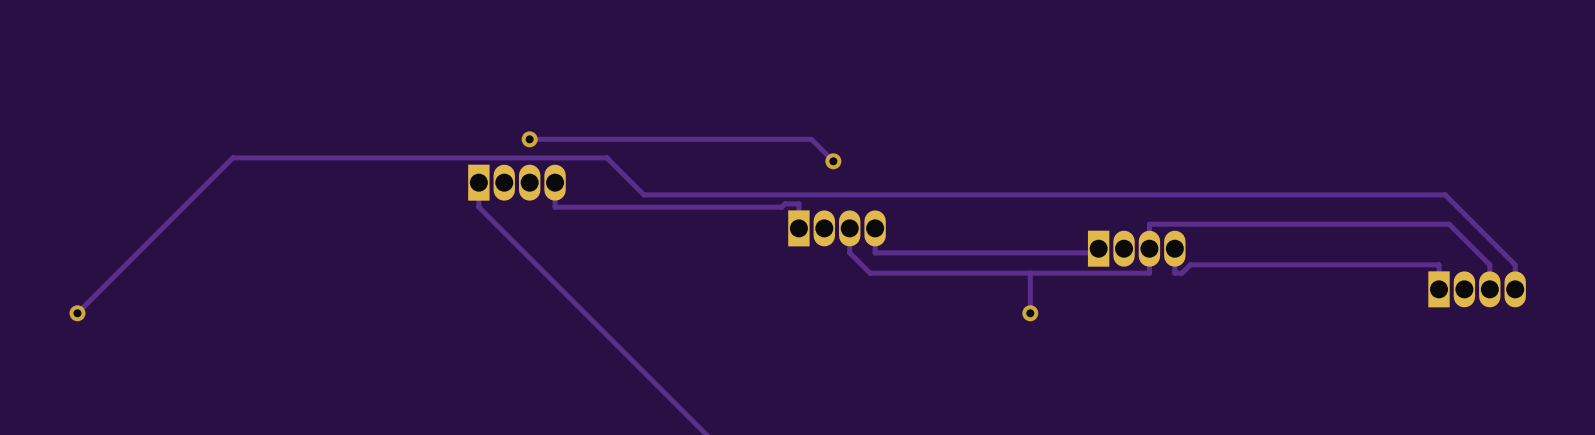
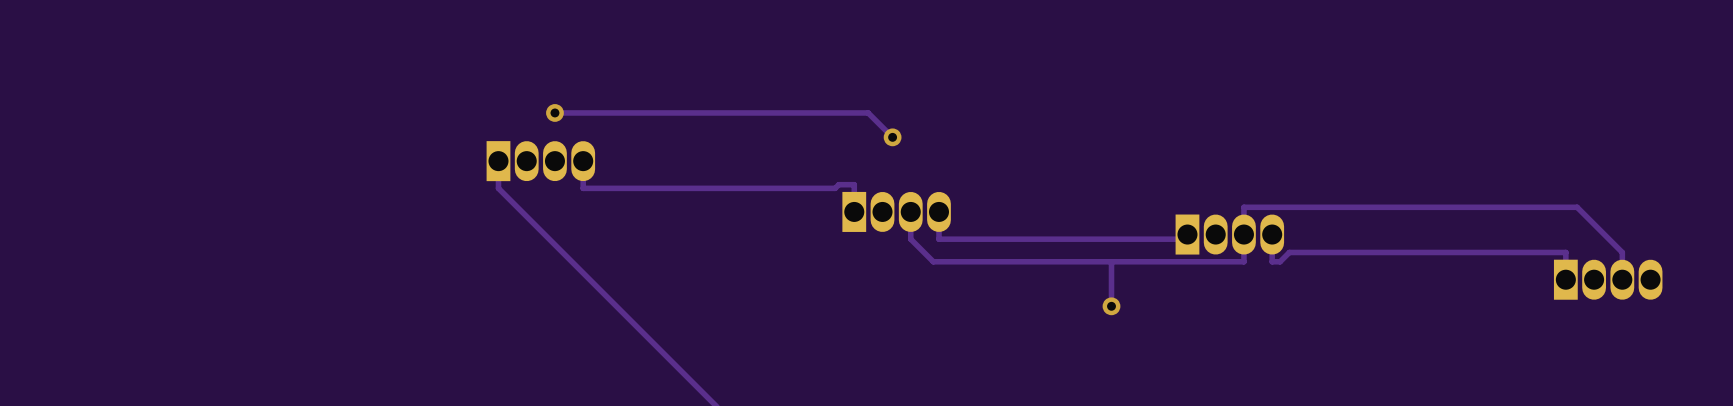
track: (1515, 289) (1515, 264) (1445, 194) (643, 194) (606, 157) (232, 157) (77, 313) -> none
via: (77, 313) -> none

